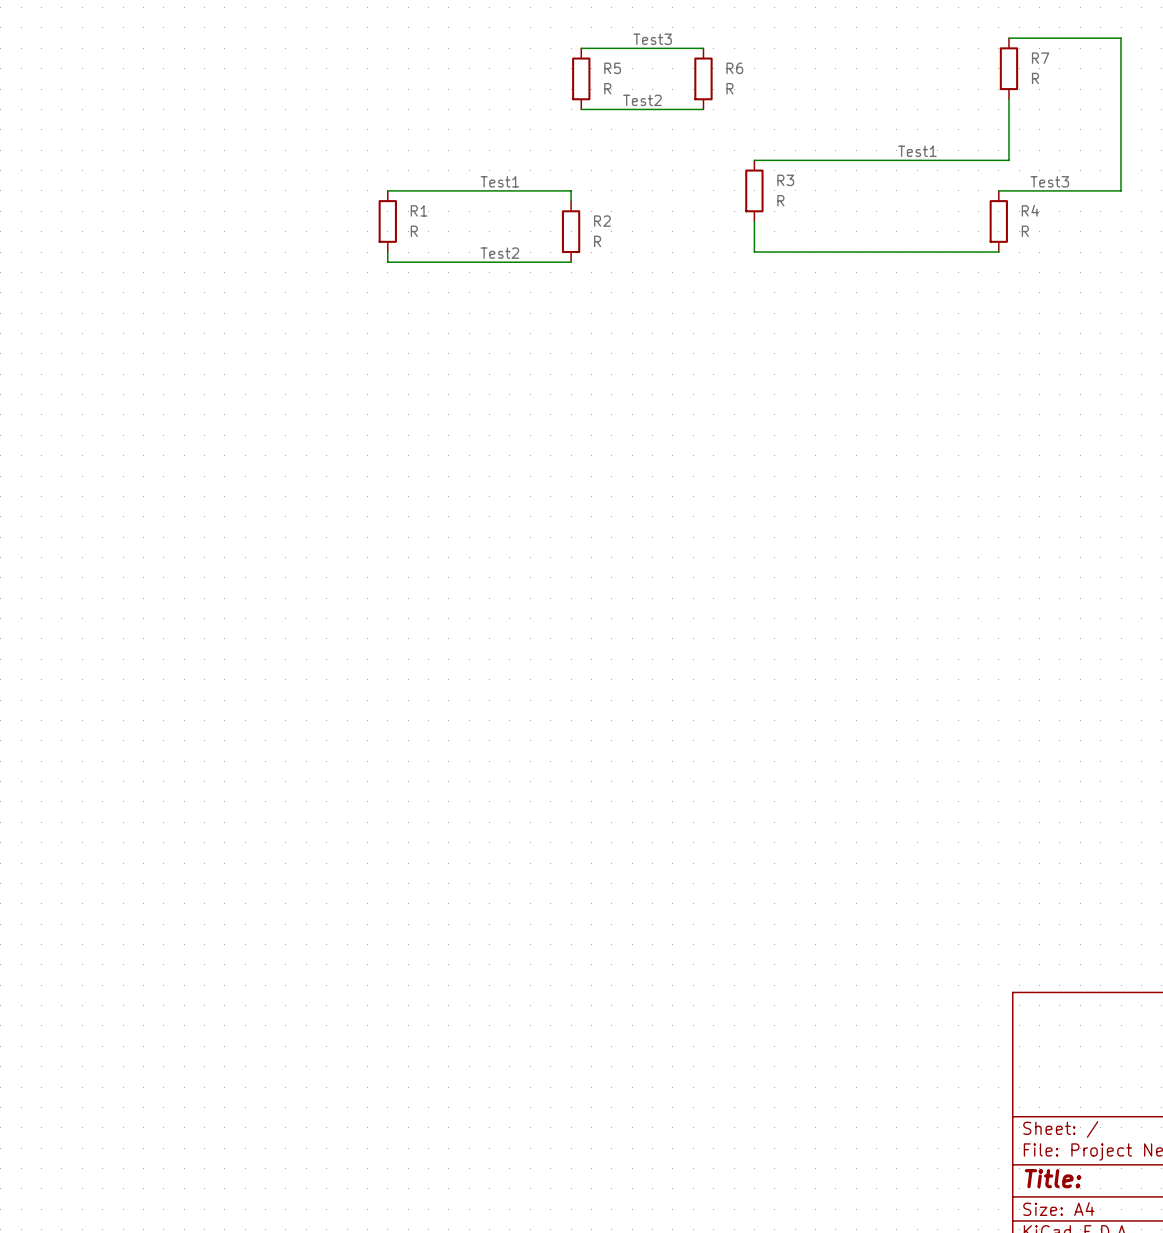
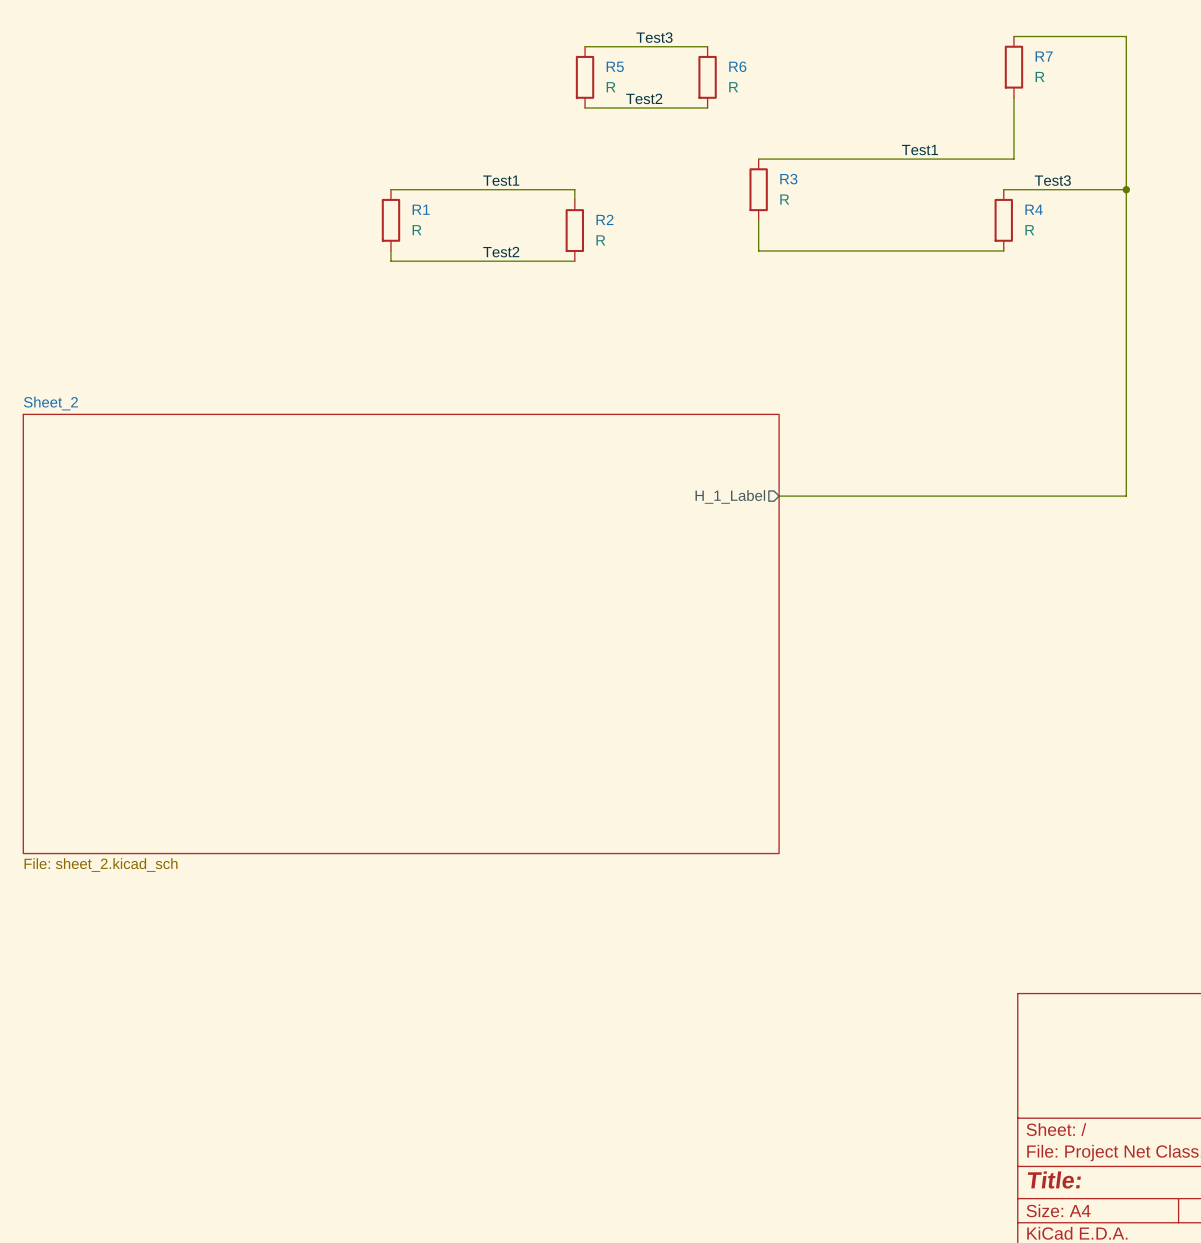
wire: none -> (1126, 189) (1126, 496) (779, 496)
junction: none -> (1126, 189)
sheet pin: none -> H_1_Label (730, 496)
sheet Sheet_2: none -> File: sheet_2.kicad_sch (401, 633)

